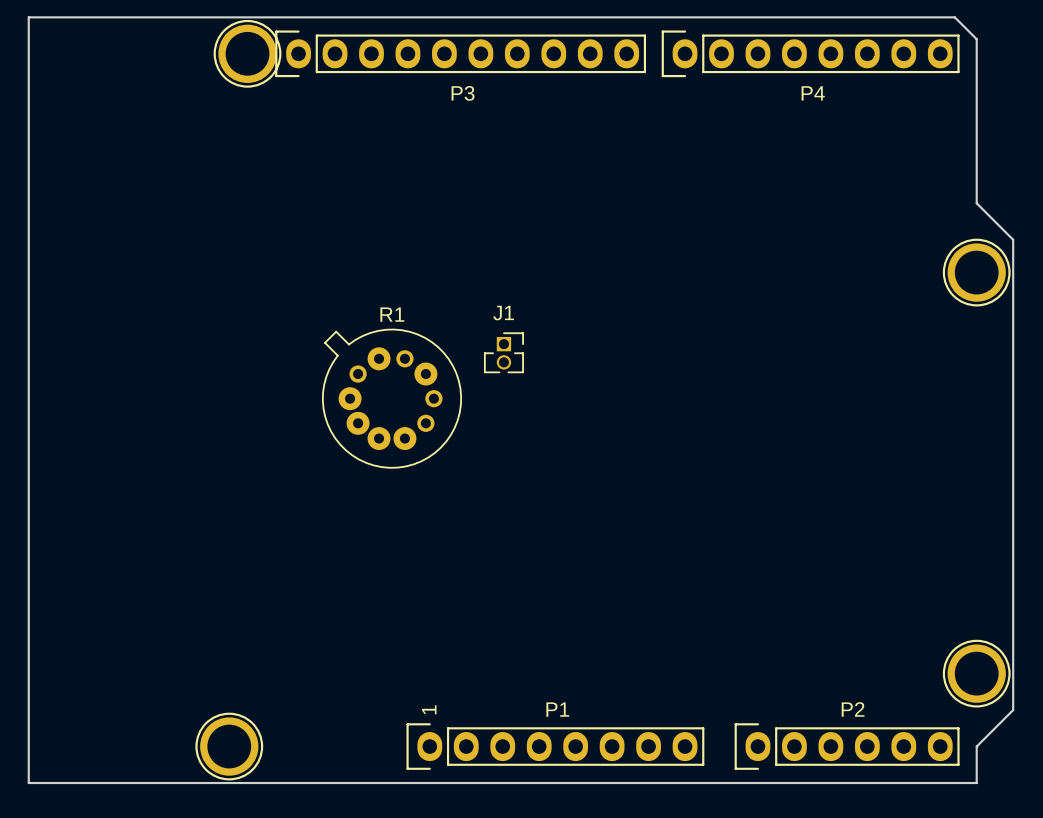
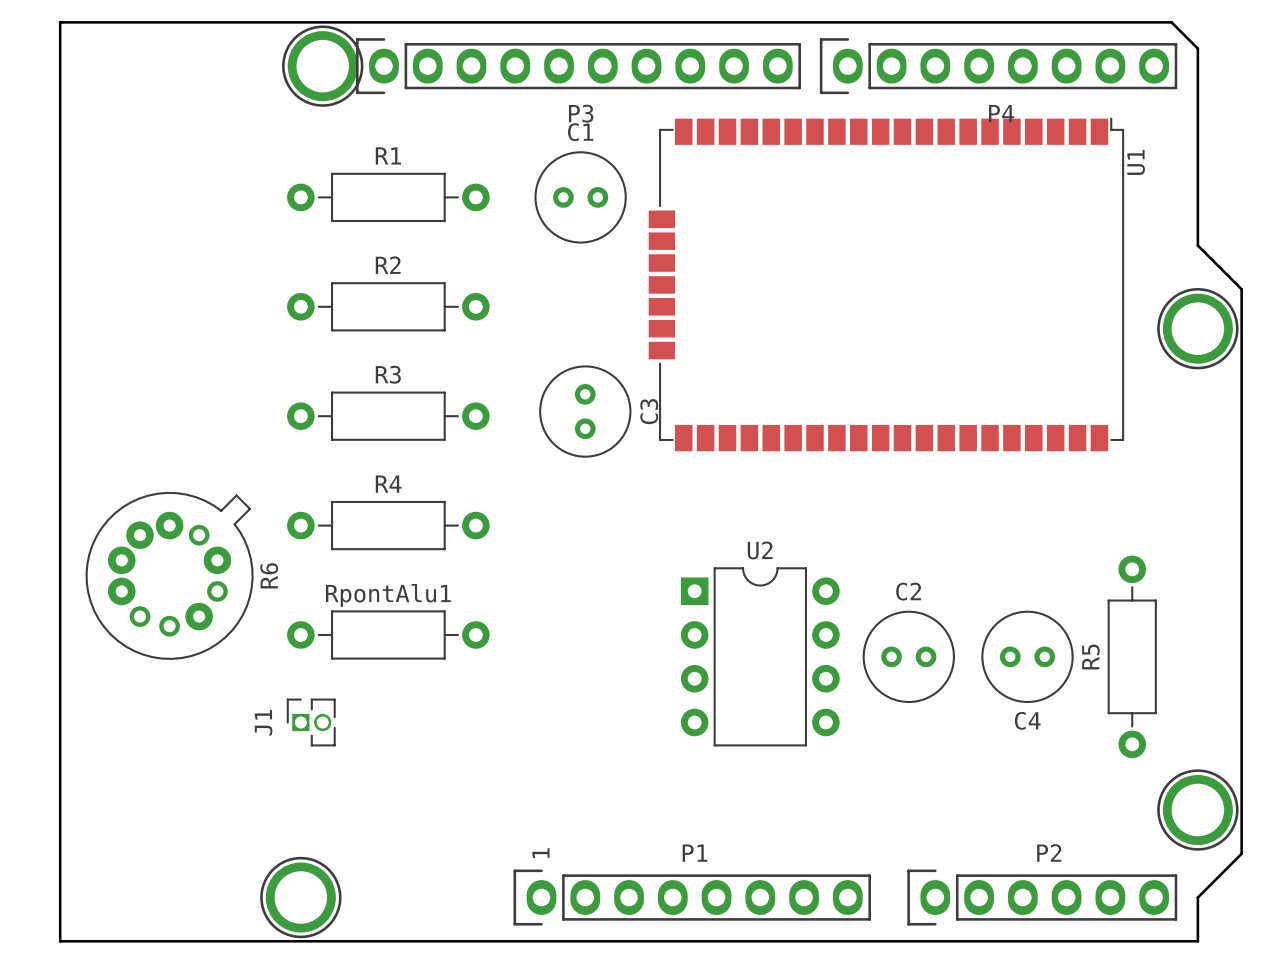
C1: none -> (580, 197)
U1: none -> (886, 284)
R2: none -> (388, 306)
R1 name position: R1 (392, 314) -> R1 (388, 155)
R1 footprint: [321, 328, 463, 469] -> [287, 172, 490, 223]
C3: none -> (585, 411)
R3: none -> (388, 416)
J1 rotation: 0° (503, 352) -> 90° counterclockwise (311, 722)
J1 position: (503, 352) -> (311, 722)
R4: none -> (388, 525)
R6: none -> (169, 575)
RpontAlu1: none -> (388, 634)
U2: none -> (760, 656)
C2: none -> (908, 656)
C4: none -> (1027, 656)
R5: none -> (1132, 656)

